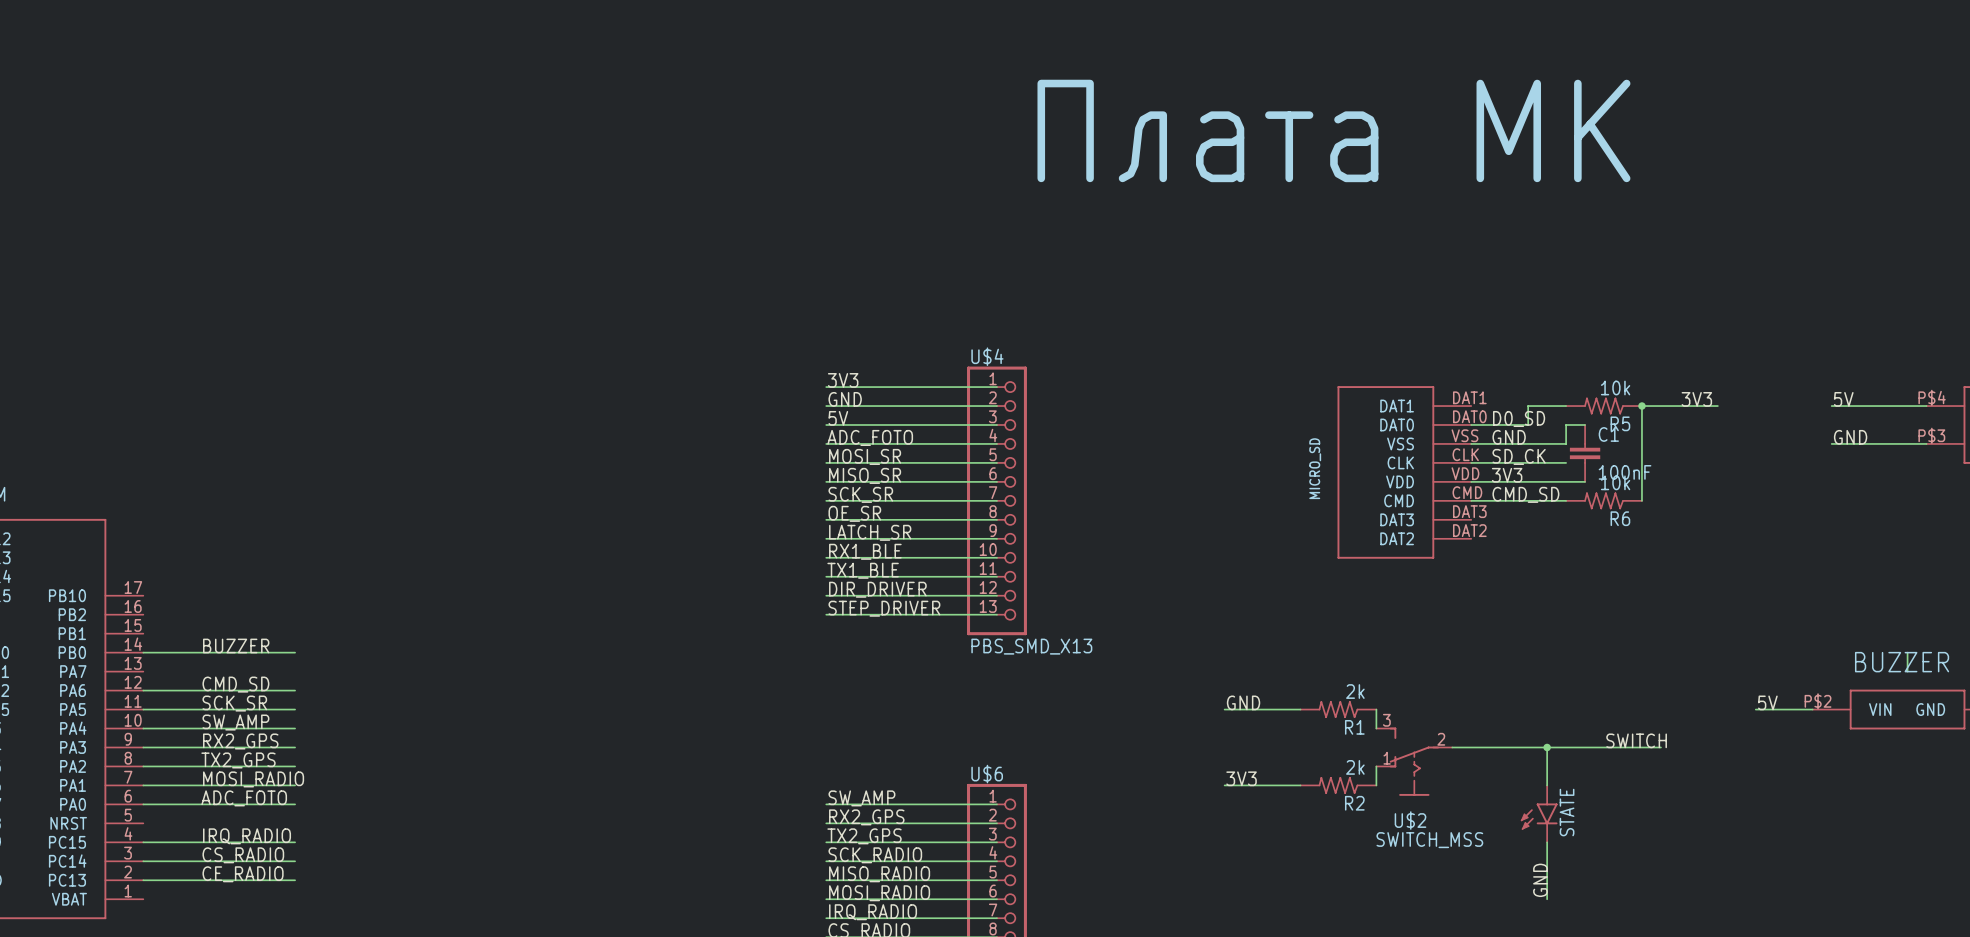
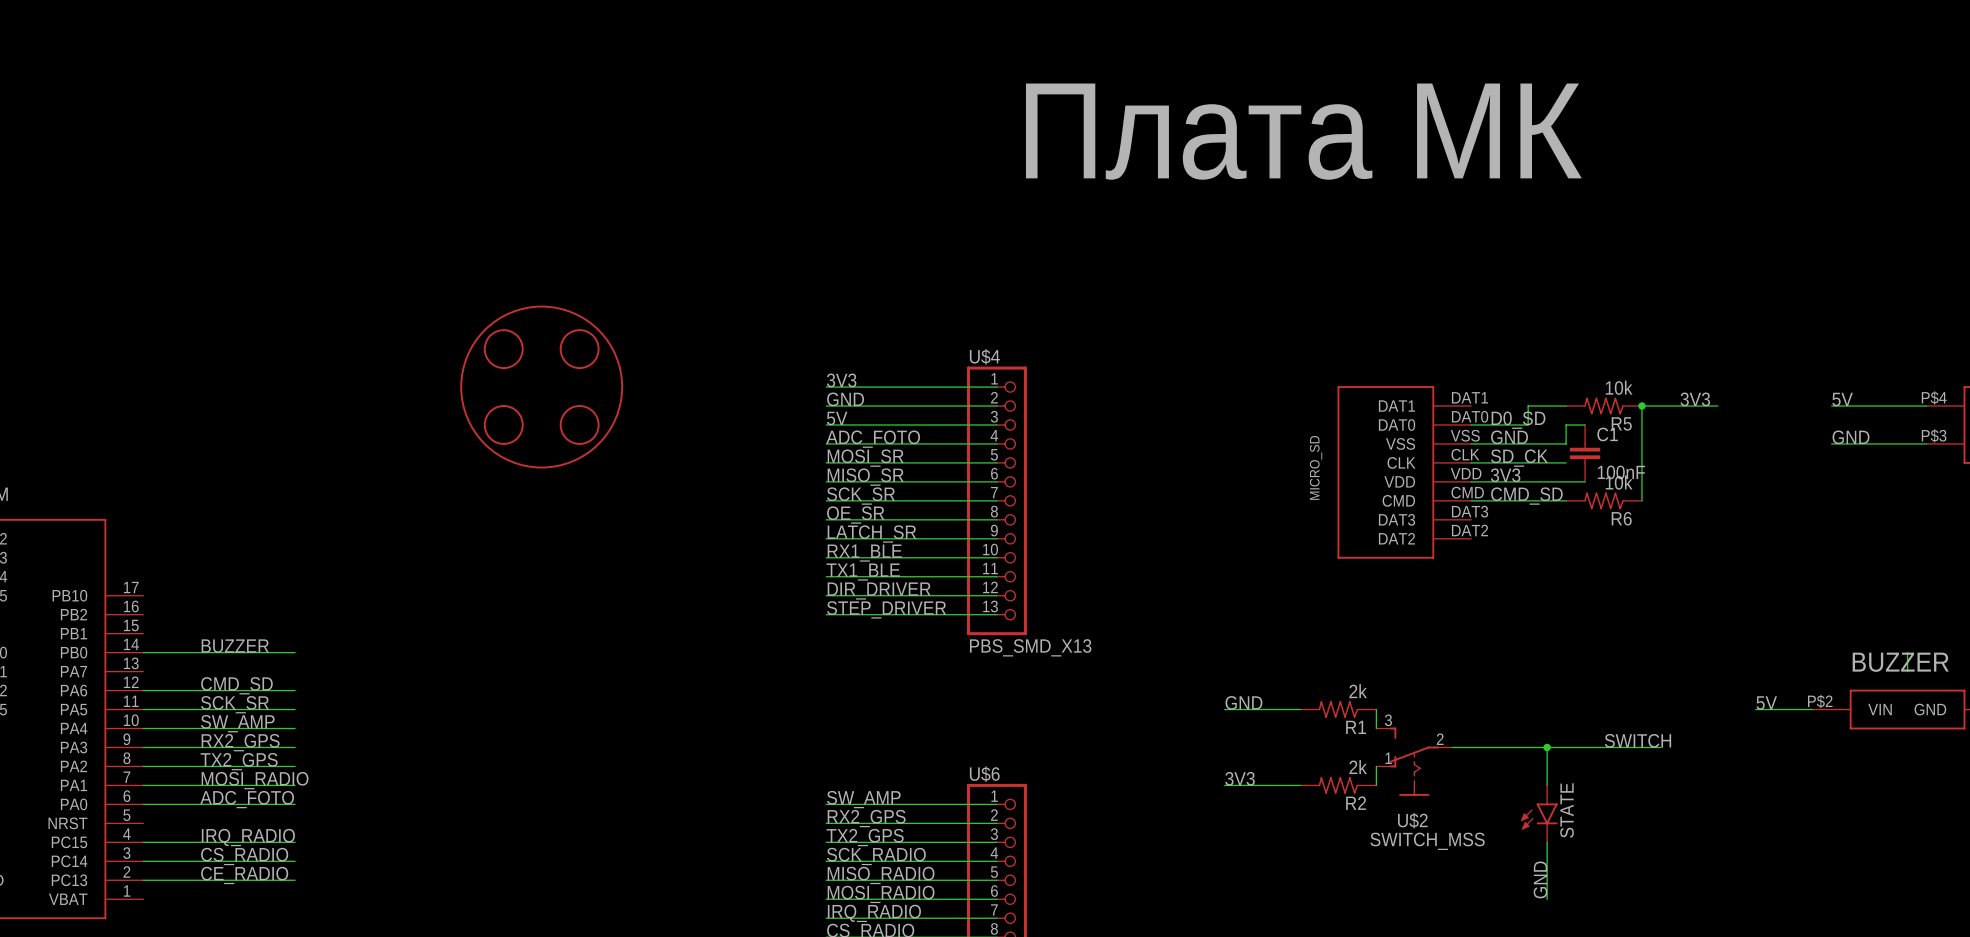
part: none -> (541, 387)

